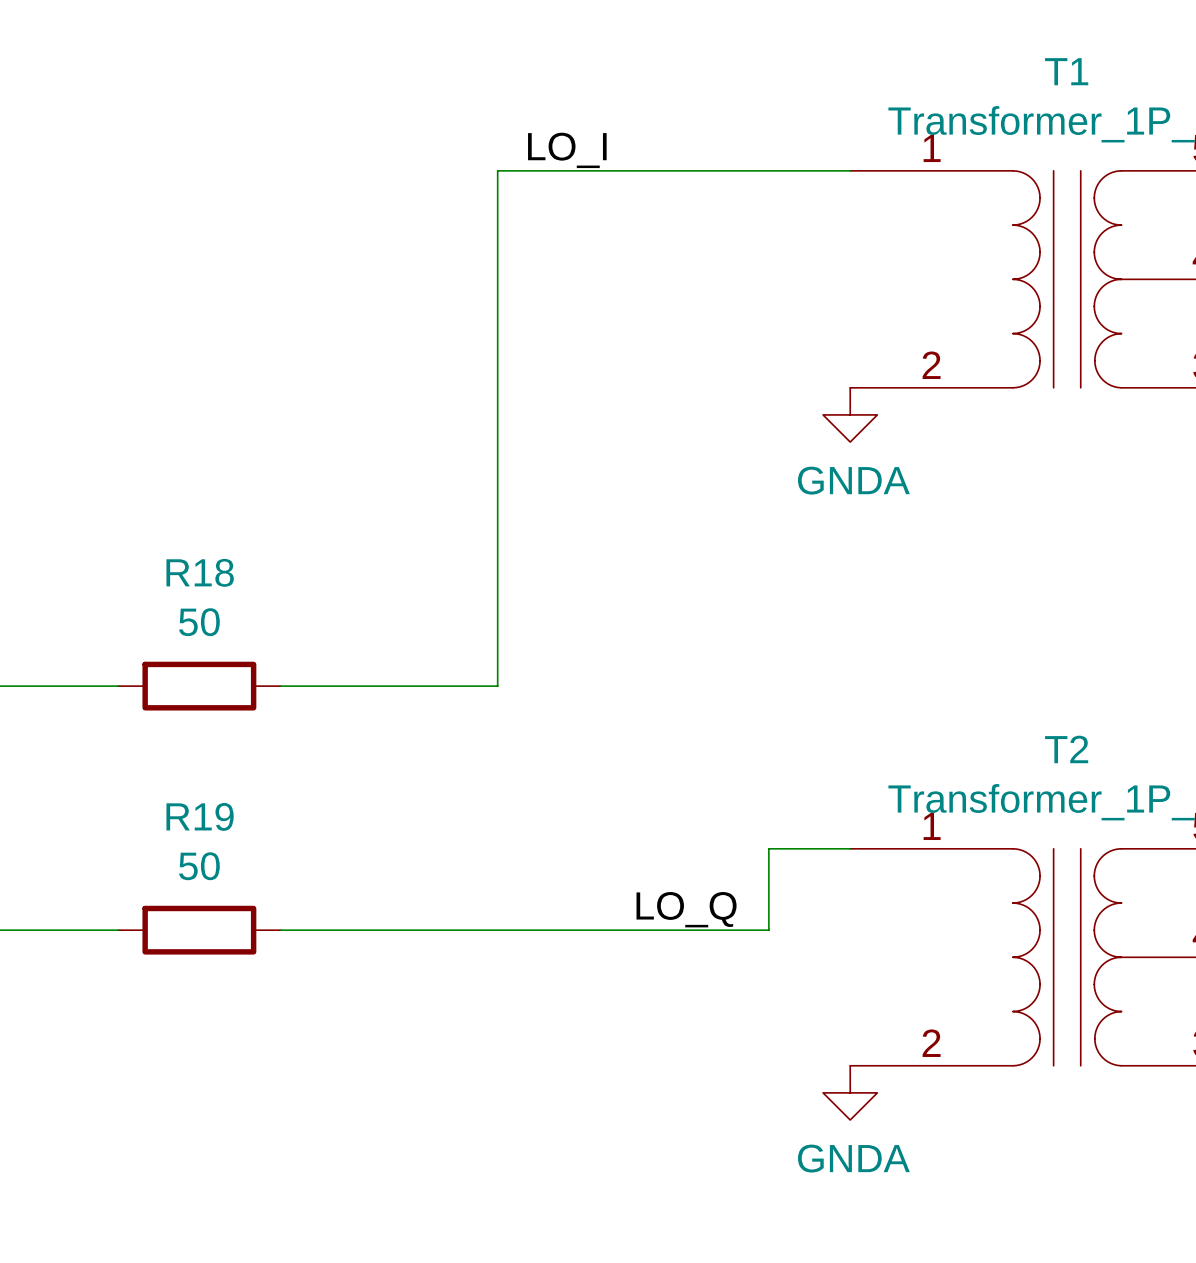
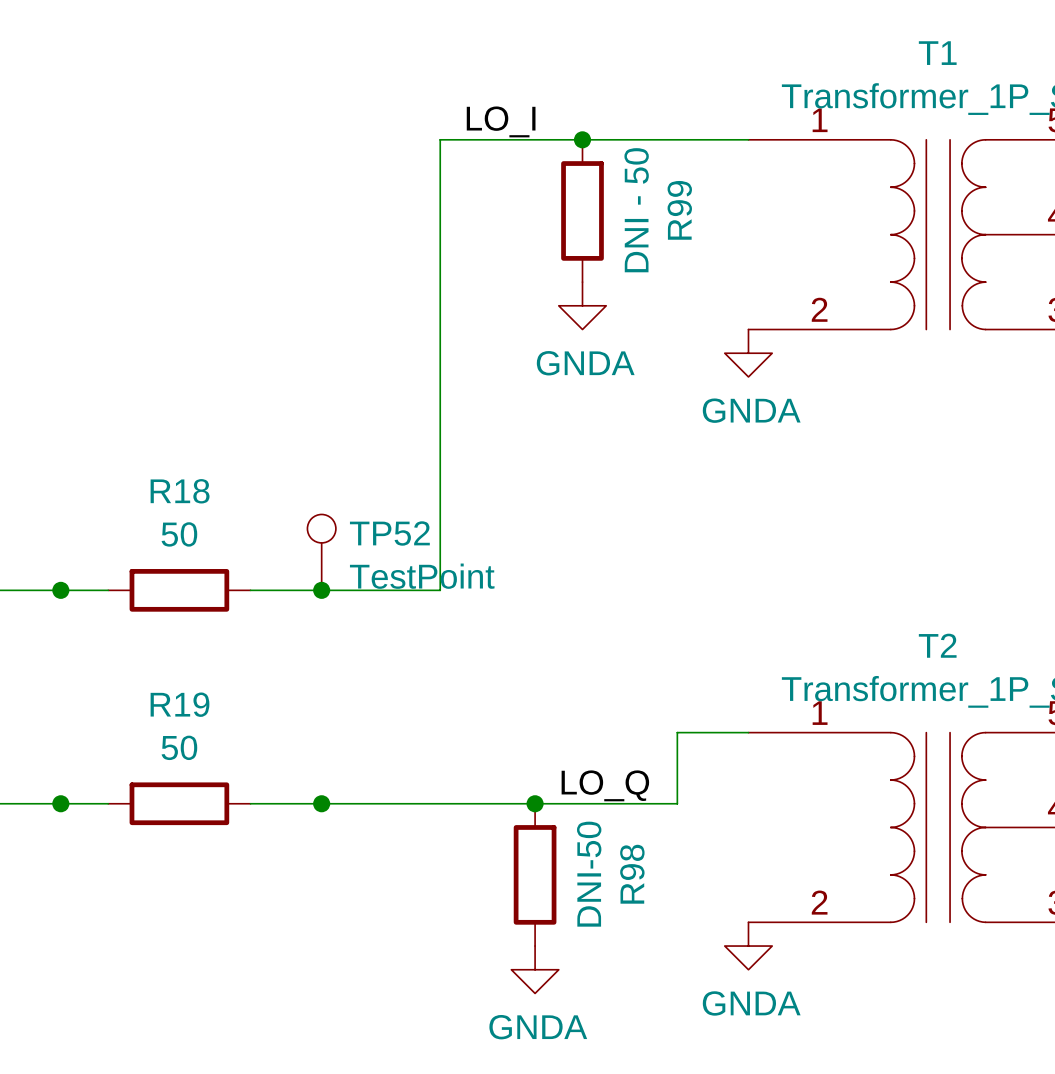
junction: none -> (582, 139)
R99: none -> DNI - 50 (582, 210)
power symbol: none -> GNDA (582, 305)
TP52: none -> TestPoint (321, 552)
junction: none -> (60, 590)
junction: none -> (321, 590)
junction: none -> (60, 803)
junction: none -> (321, 803)
junction: none -> (535, 803)
R98: none -> DNI-50 (535, 874)
power symbol: none -> GNDA (535, 969)

